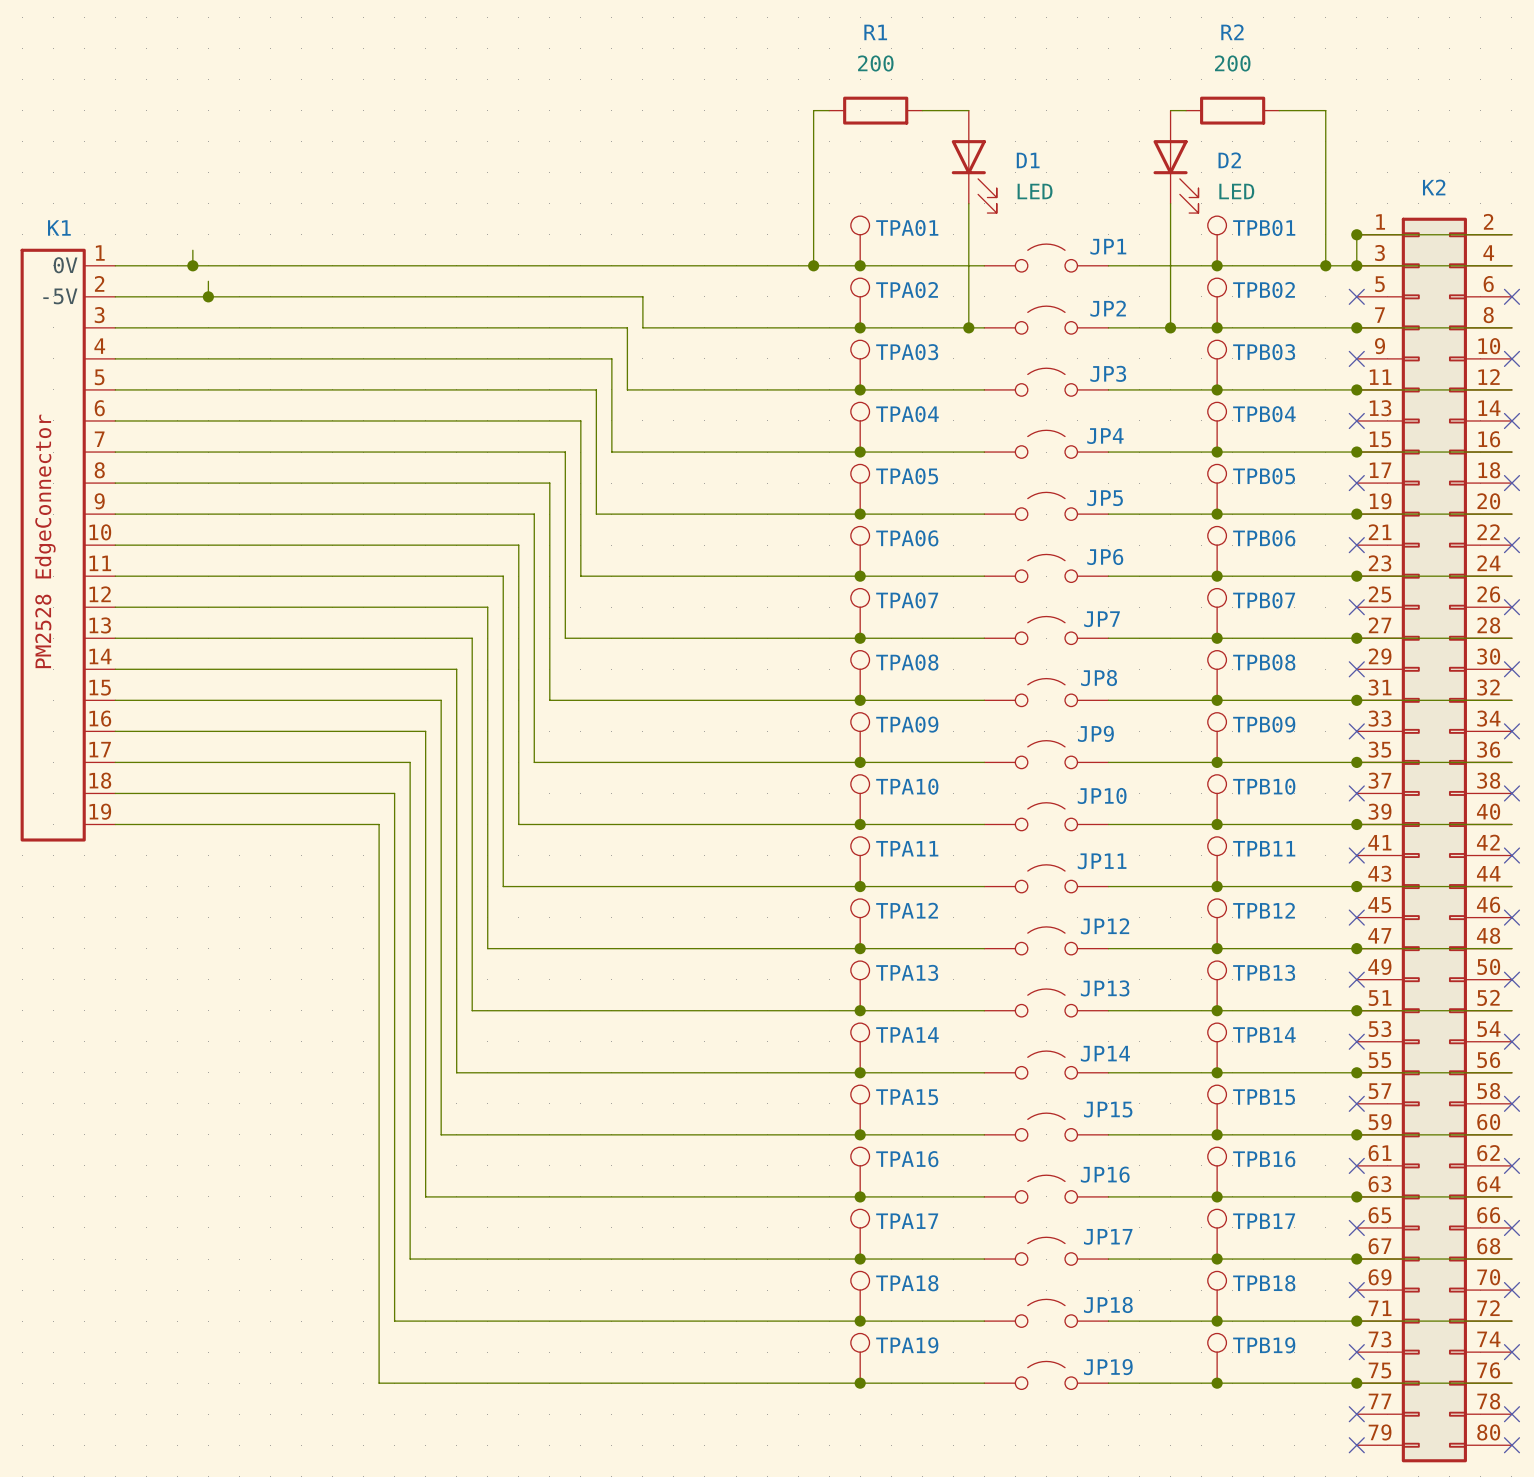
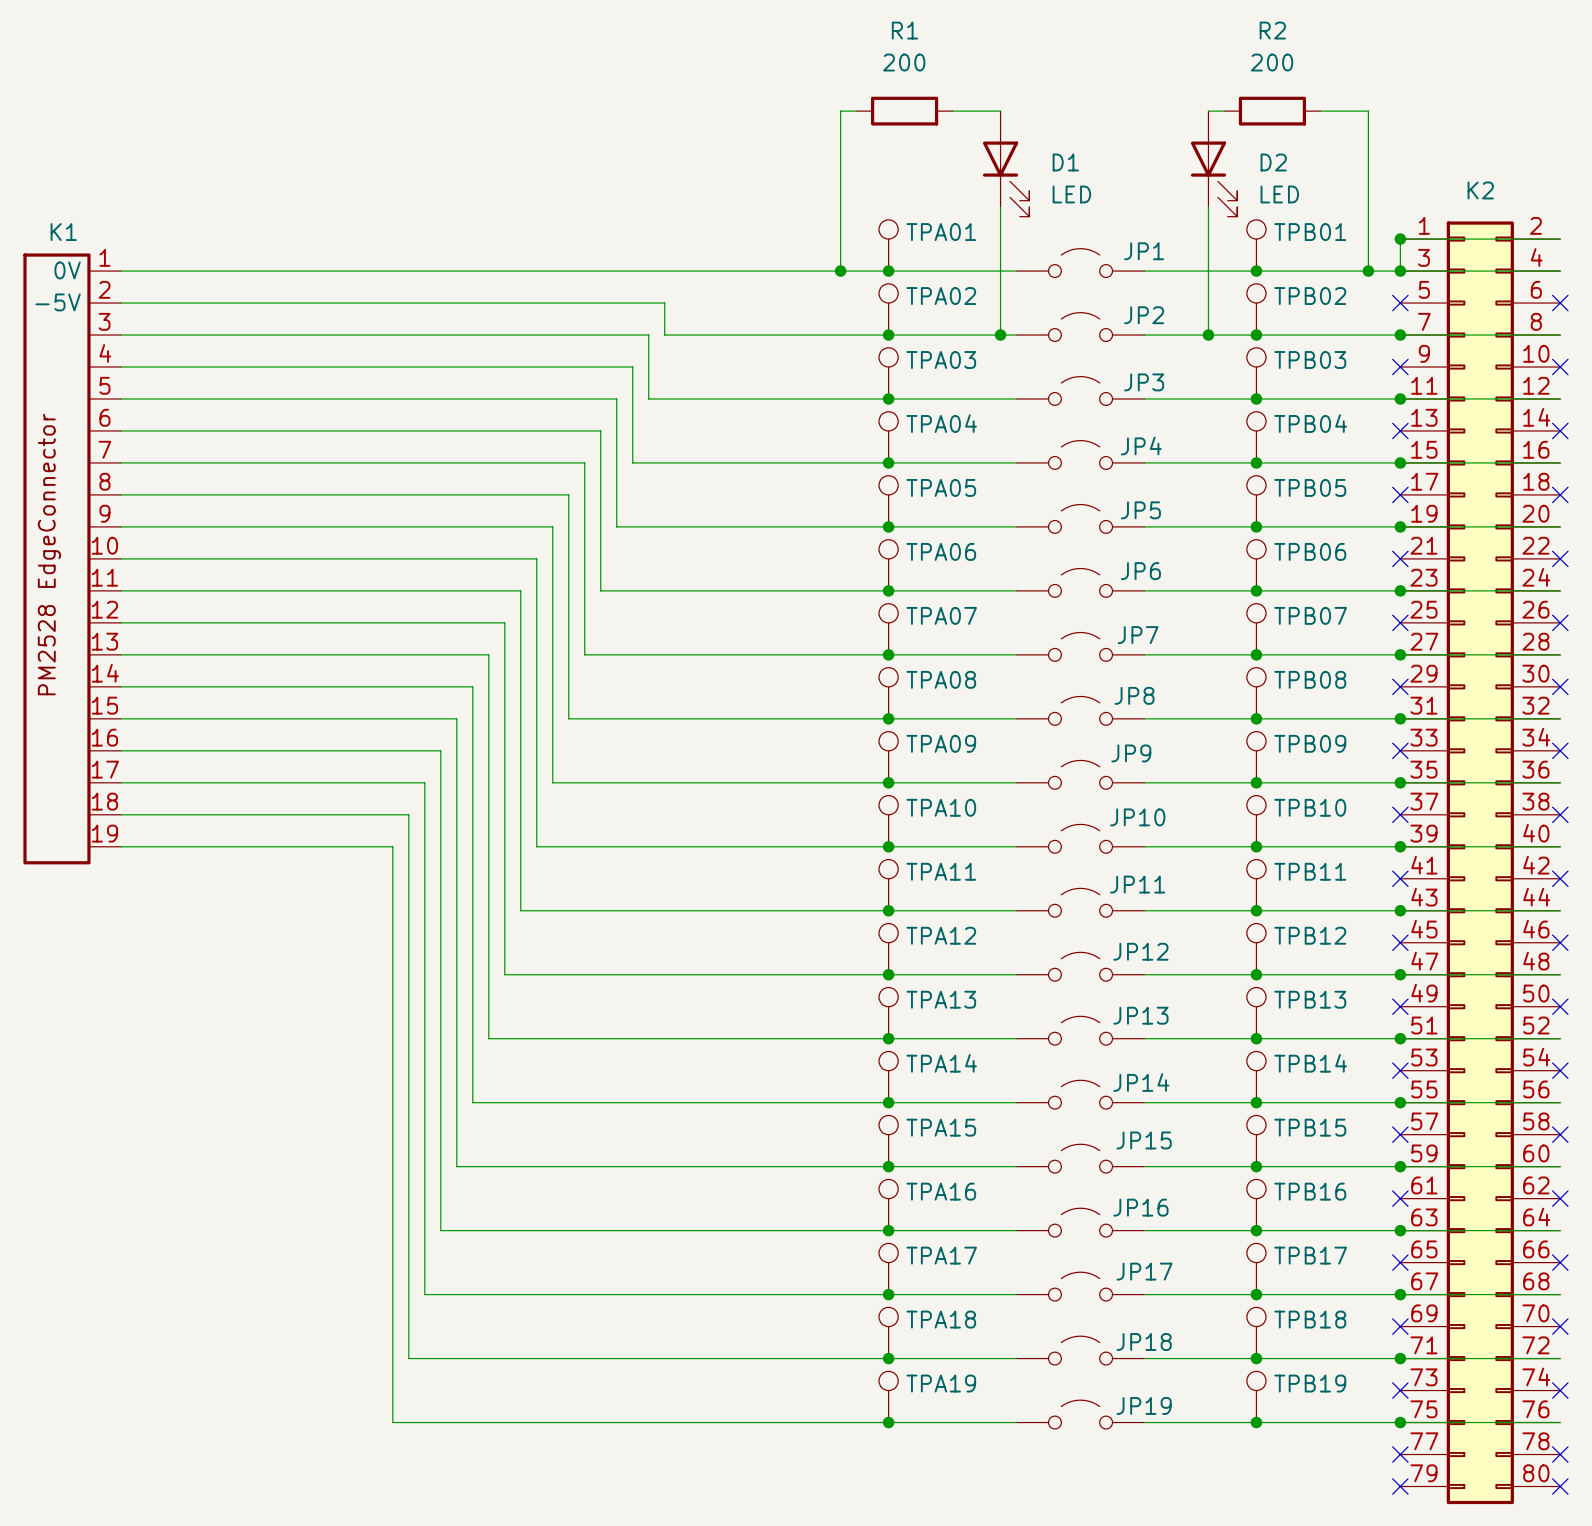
wire: (192, 250) (192, 265) -> none
junction: (192, 265) -> none
wire: (208, 281) (208, 296) -> none
junction: (208, 296) -> none

